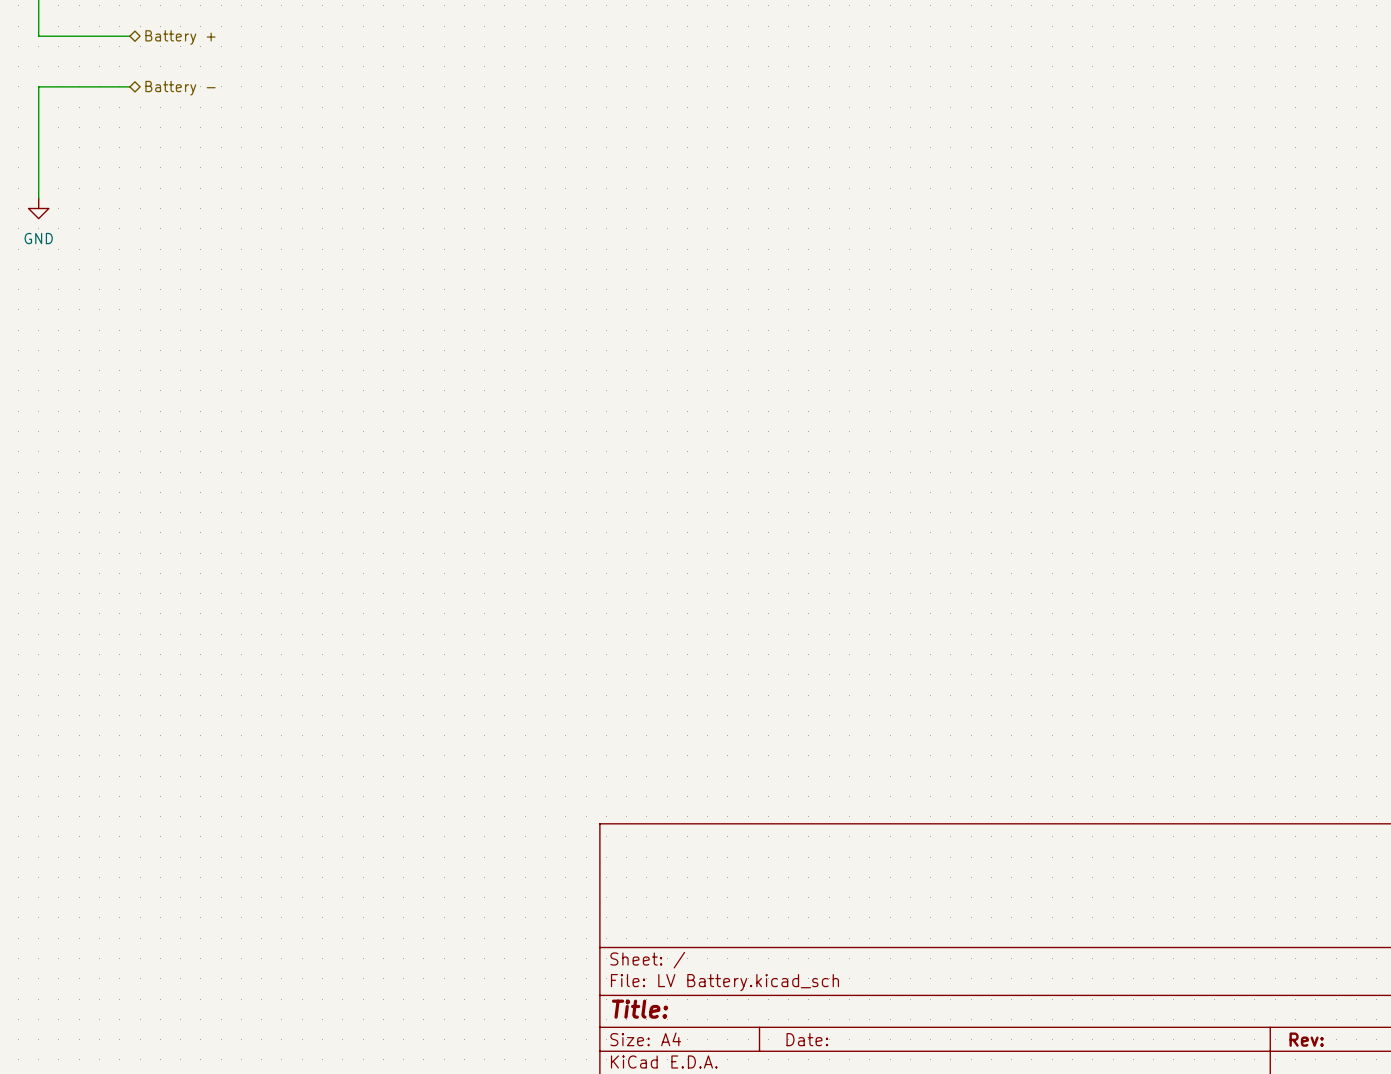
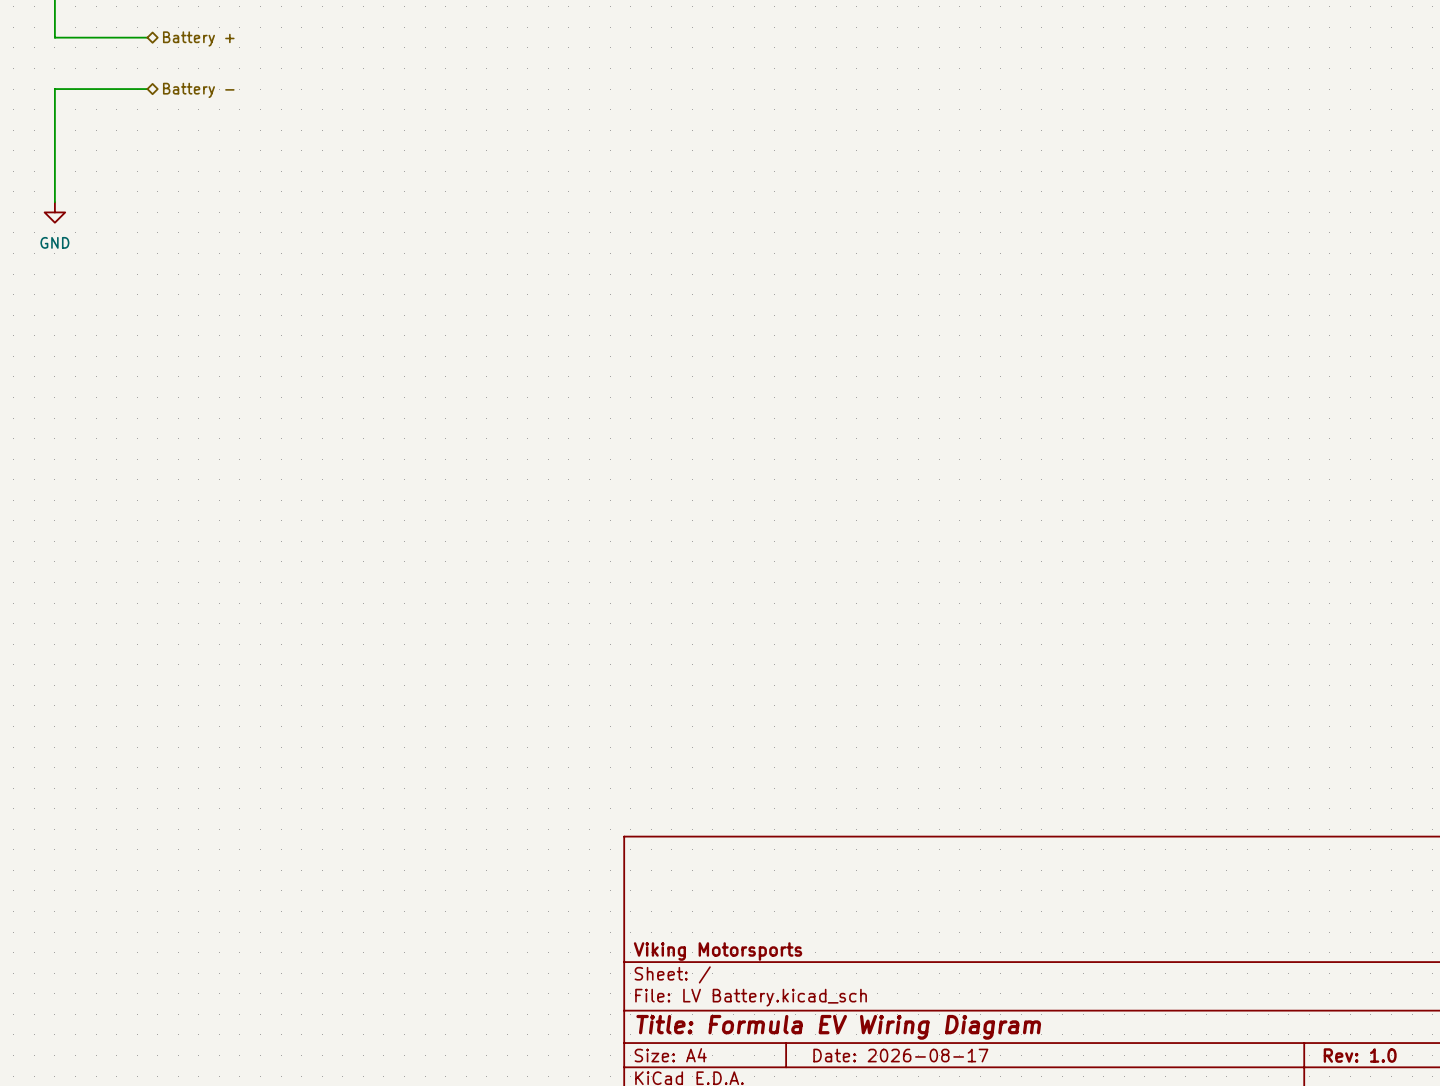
title block: none -> Viking Motorsports (718, 951)
title block: Title: (640, 1009) -> Title: Formula EV Wiring Diagram (838, 1027)
title block: Date: (807, 1039) -> Date: 2026-08-17 (900, 1055)
title block: Rev: (1306, 1039) -> Rev: 1.0 (1360, 1055)

